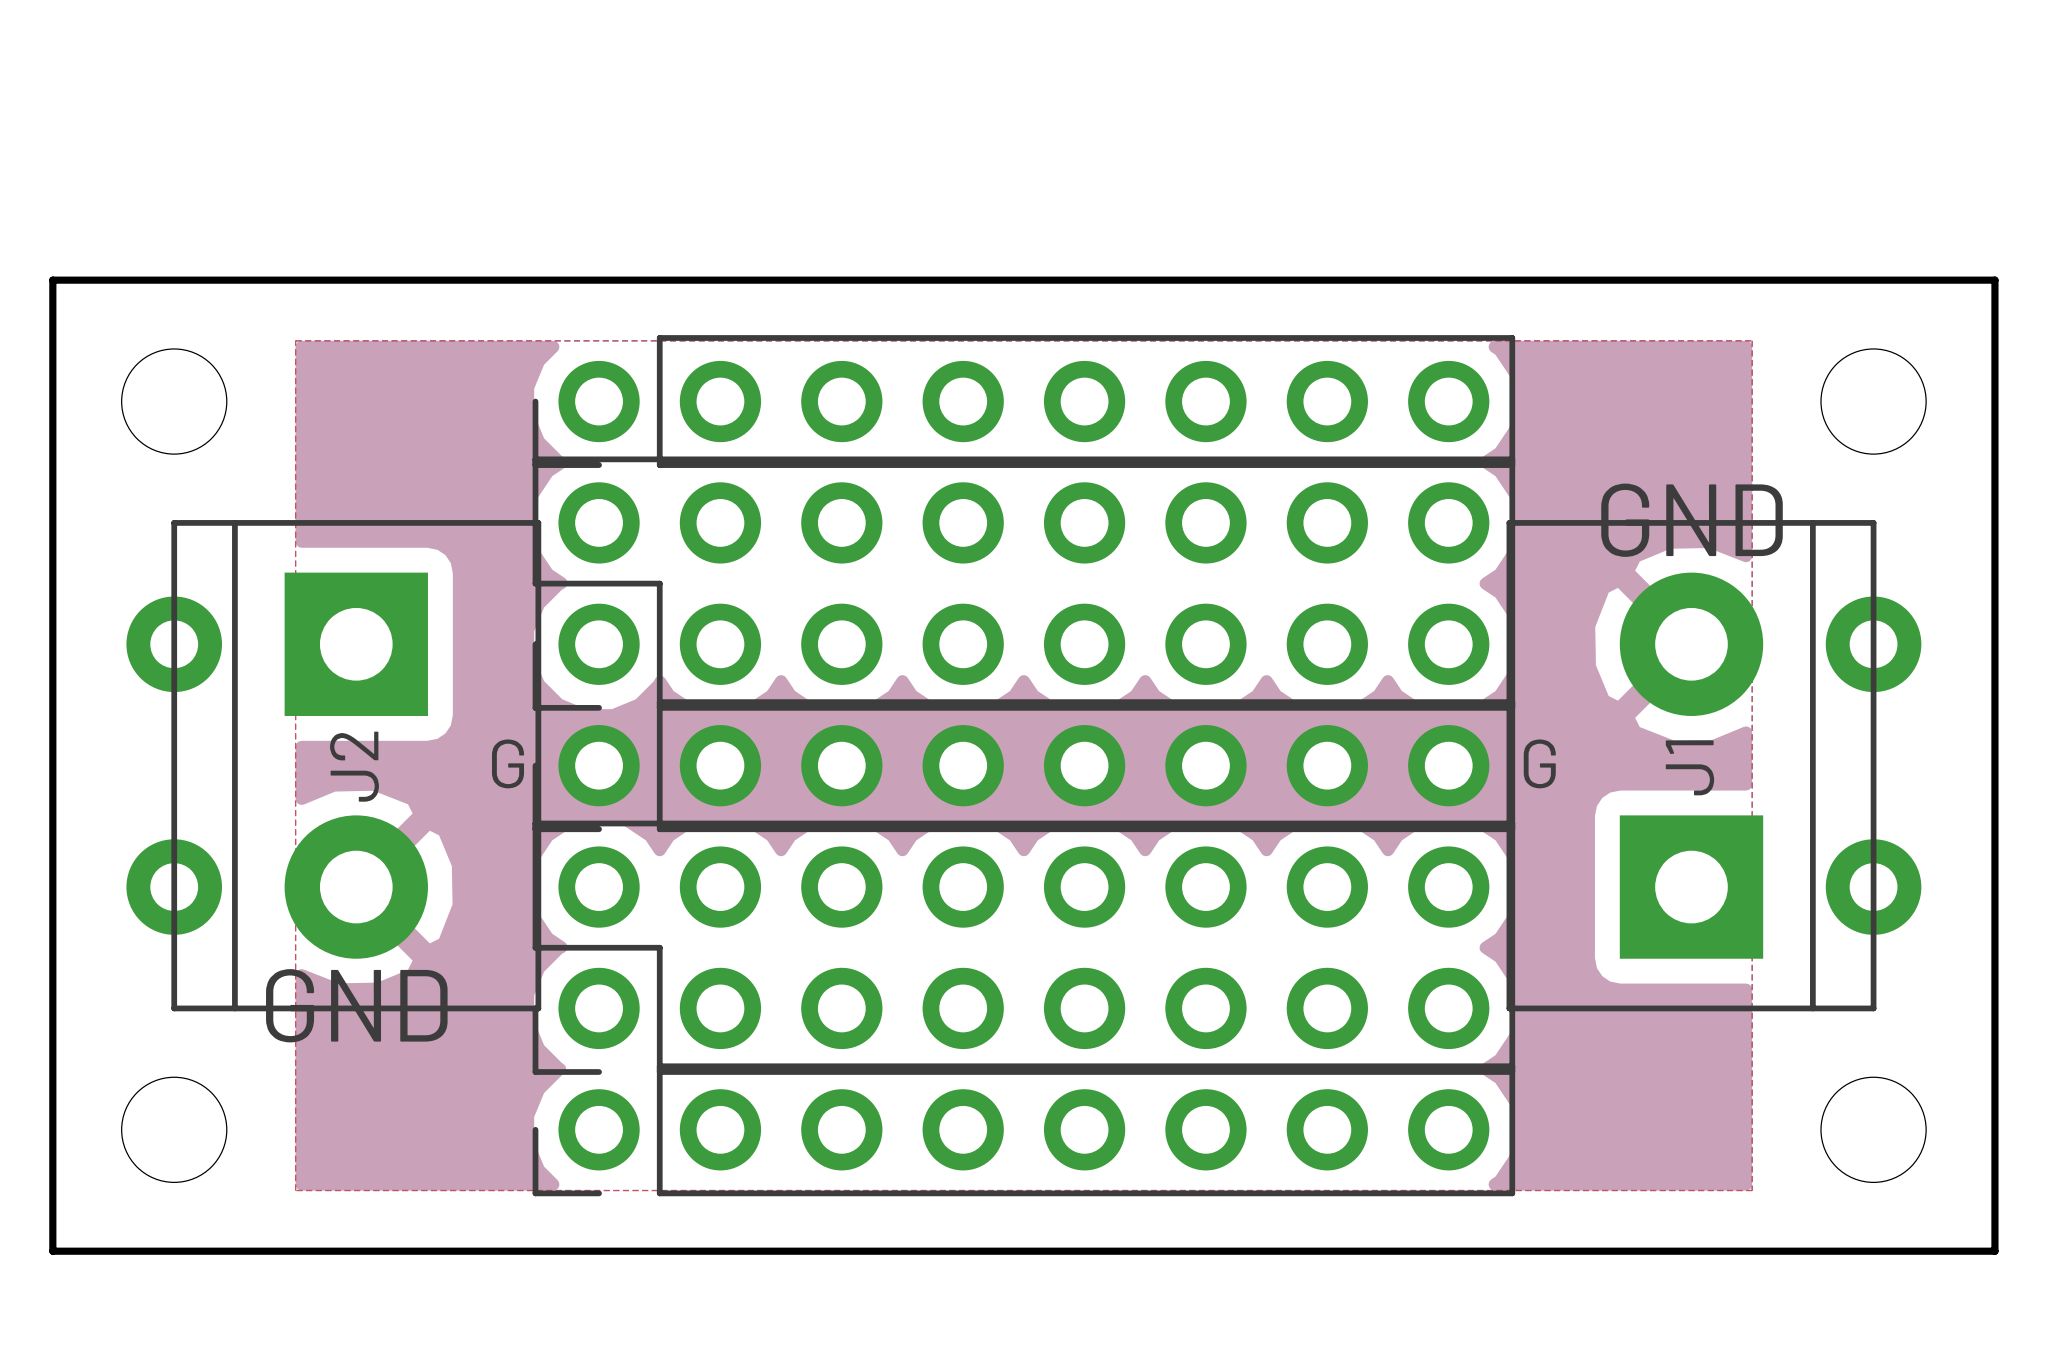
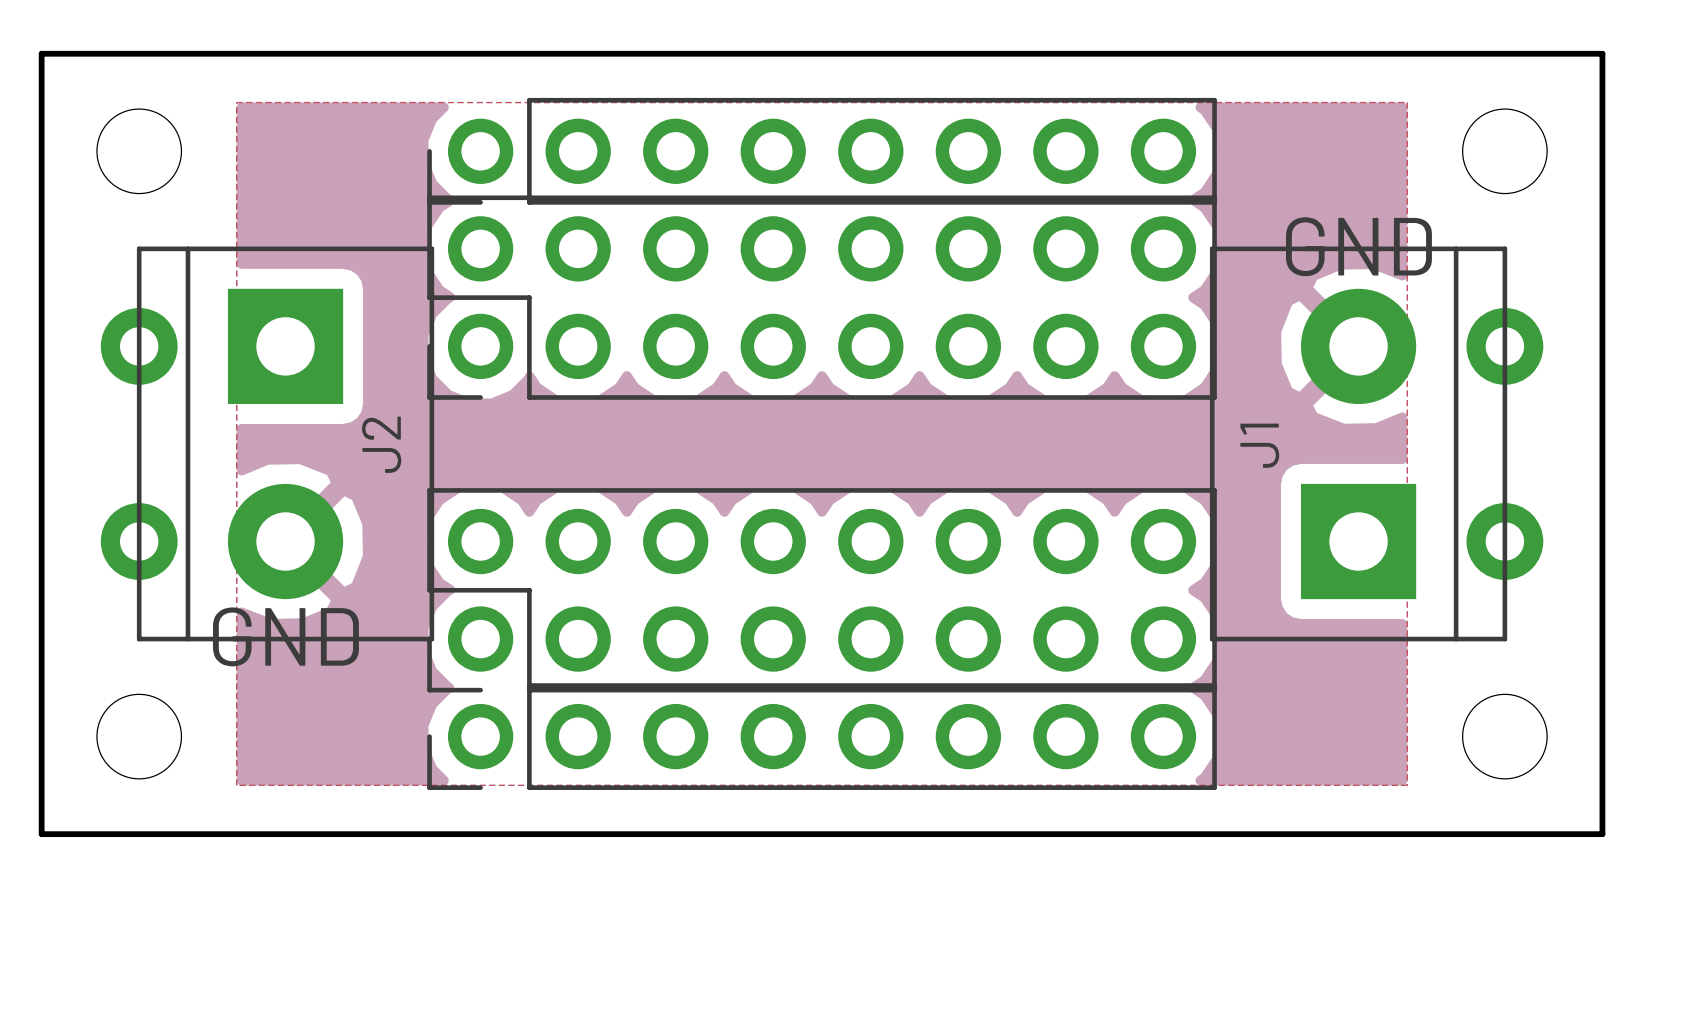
text: G (508, 763) -> none
text: G (1539, 763) -> none
part: (1023, 765) -> none
J2 name position: J2 (354, 766) -> J2 (381, 444)
J1 name position: J1 (1689, 767) -> J1 (1259, 445)

